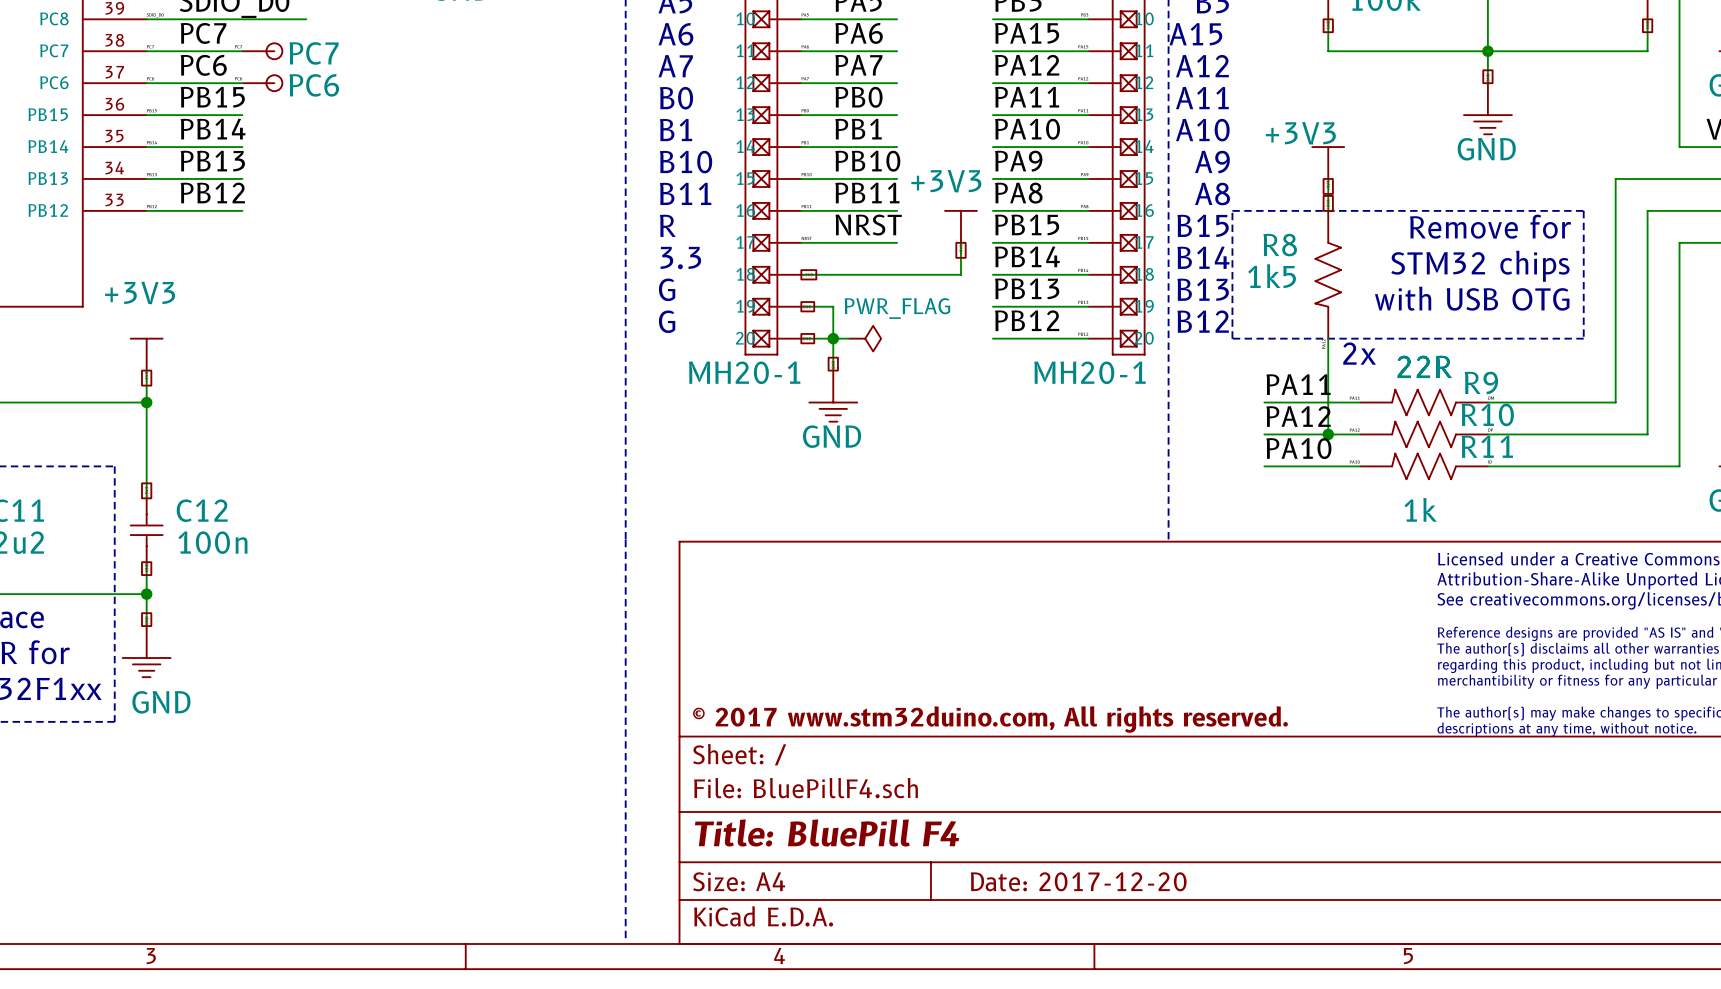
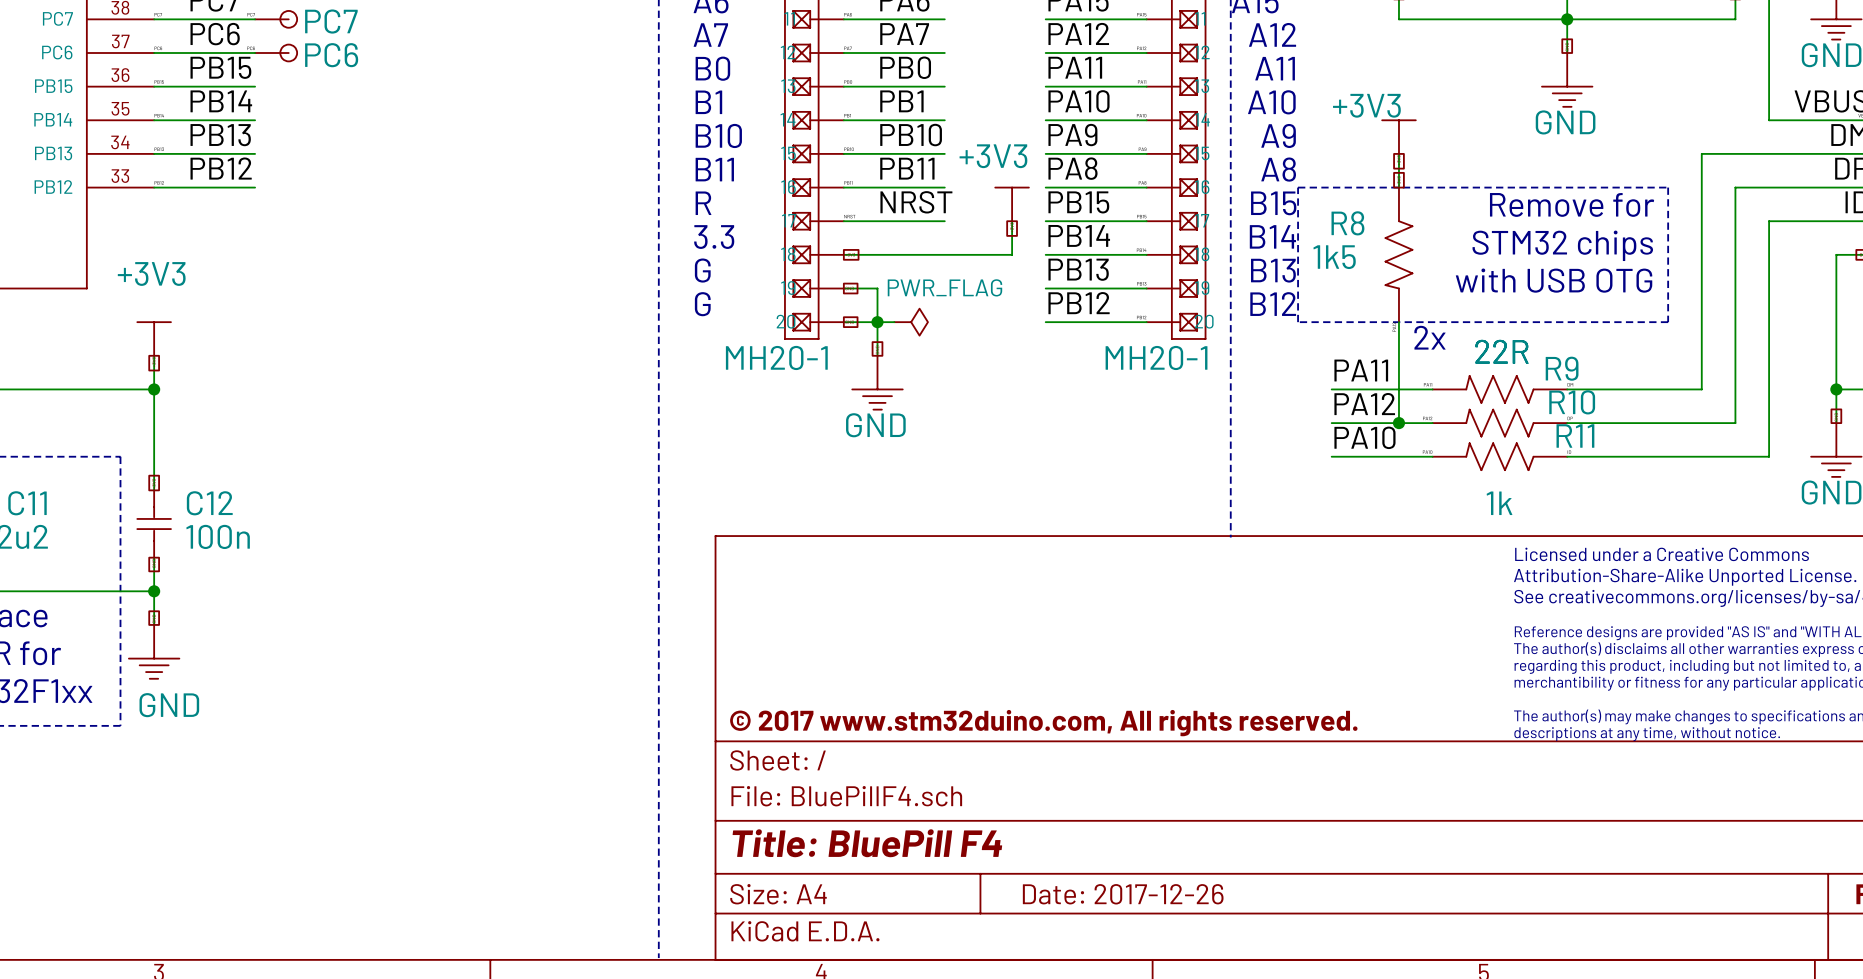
title block: Date: 2017-12-20 (1078, 881) -> Date: 2017-12-26 (1123, 894)

